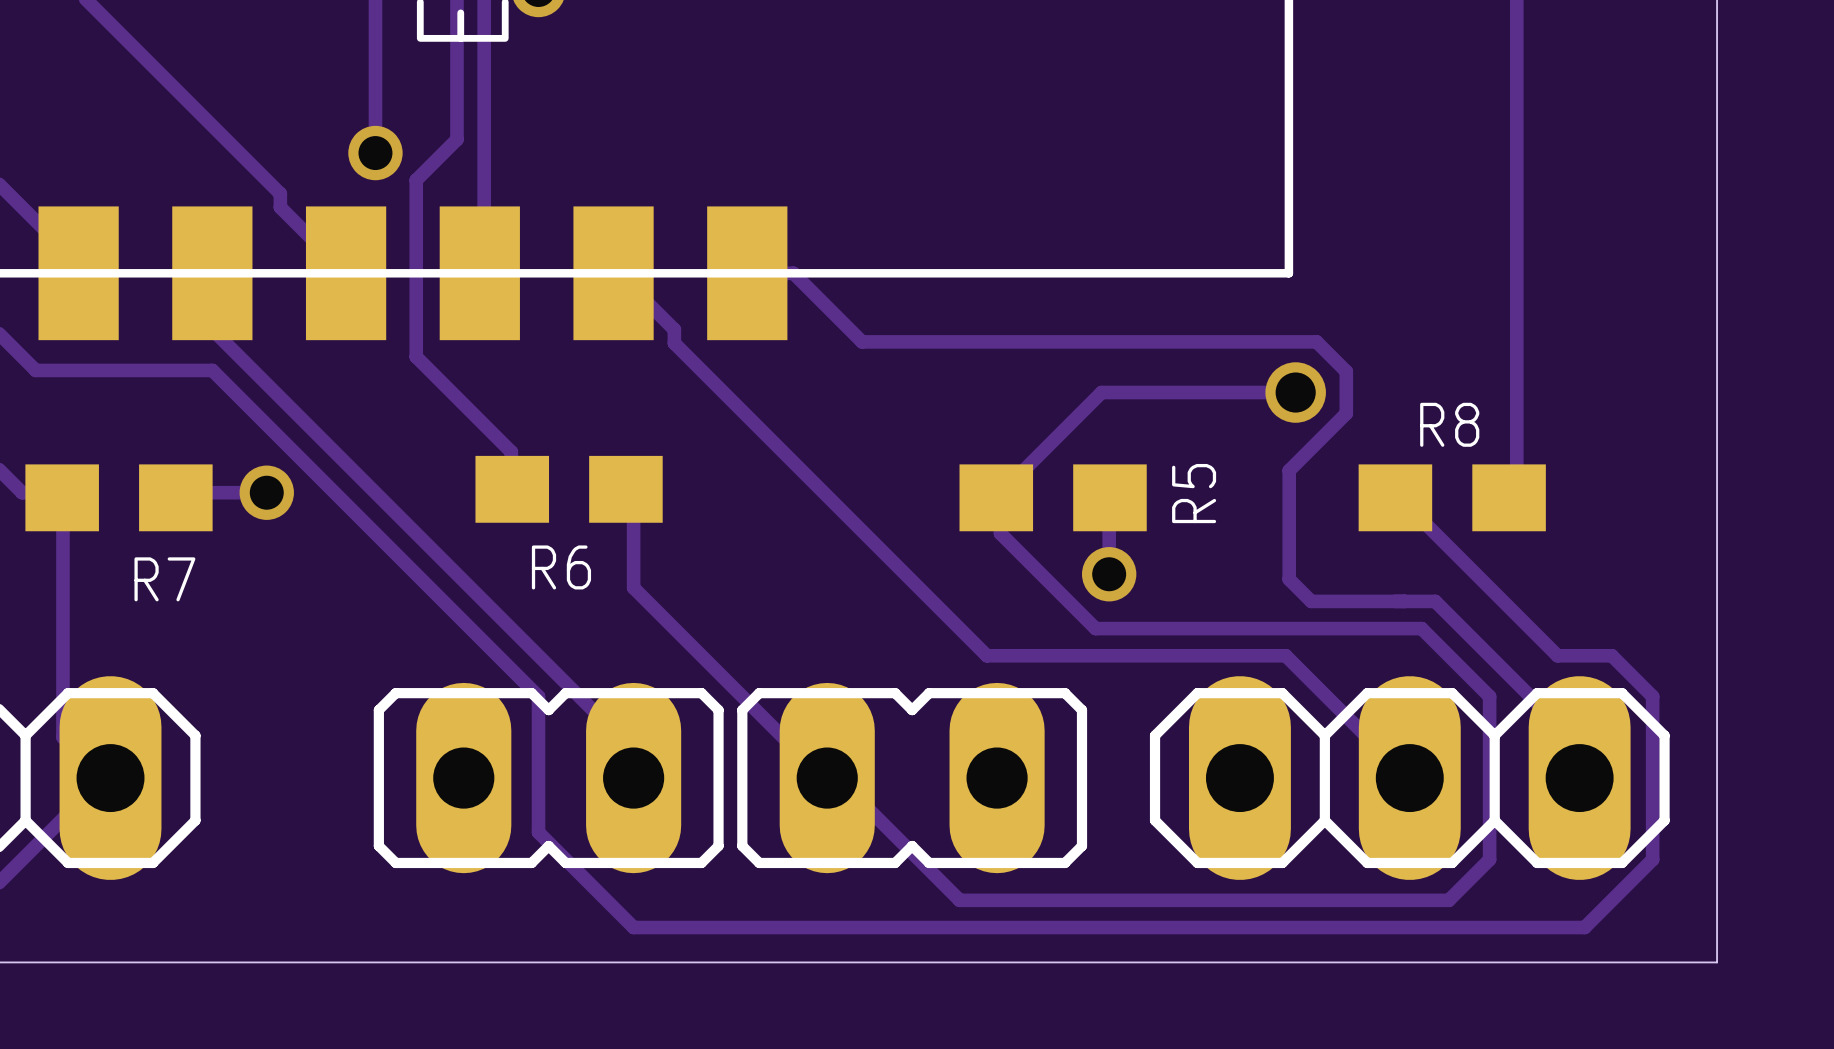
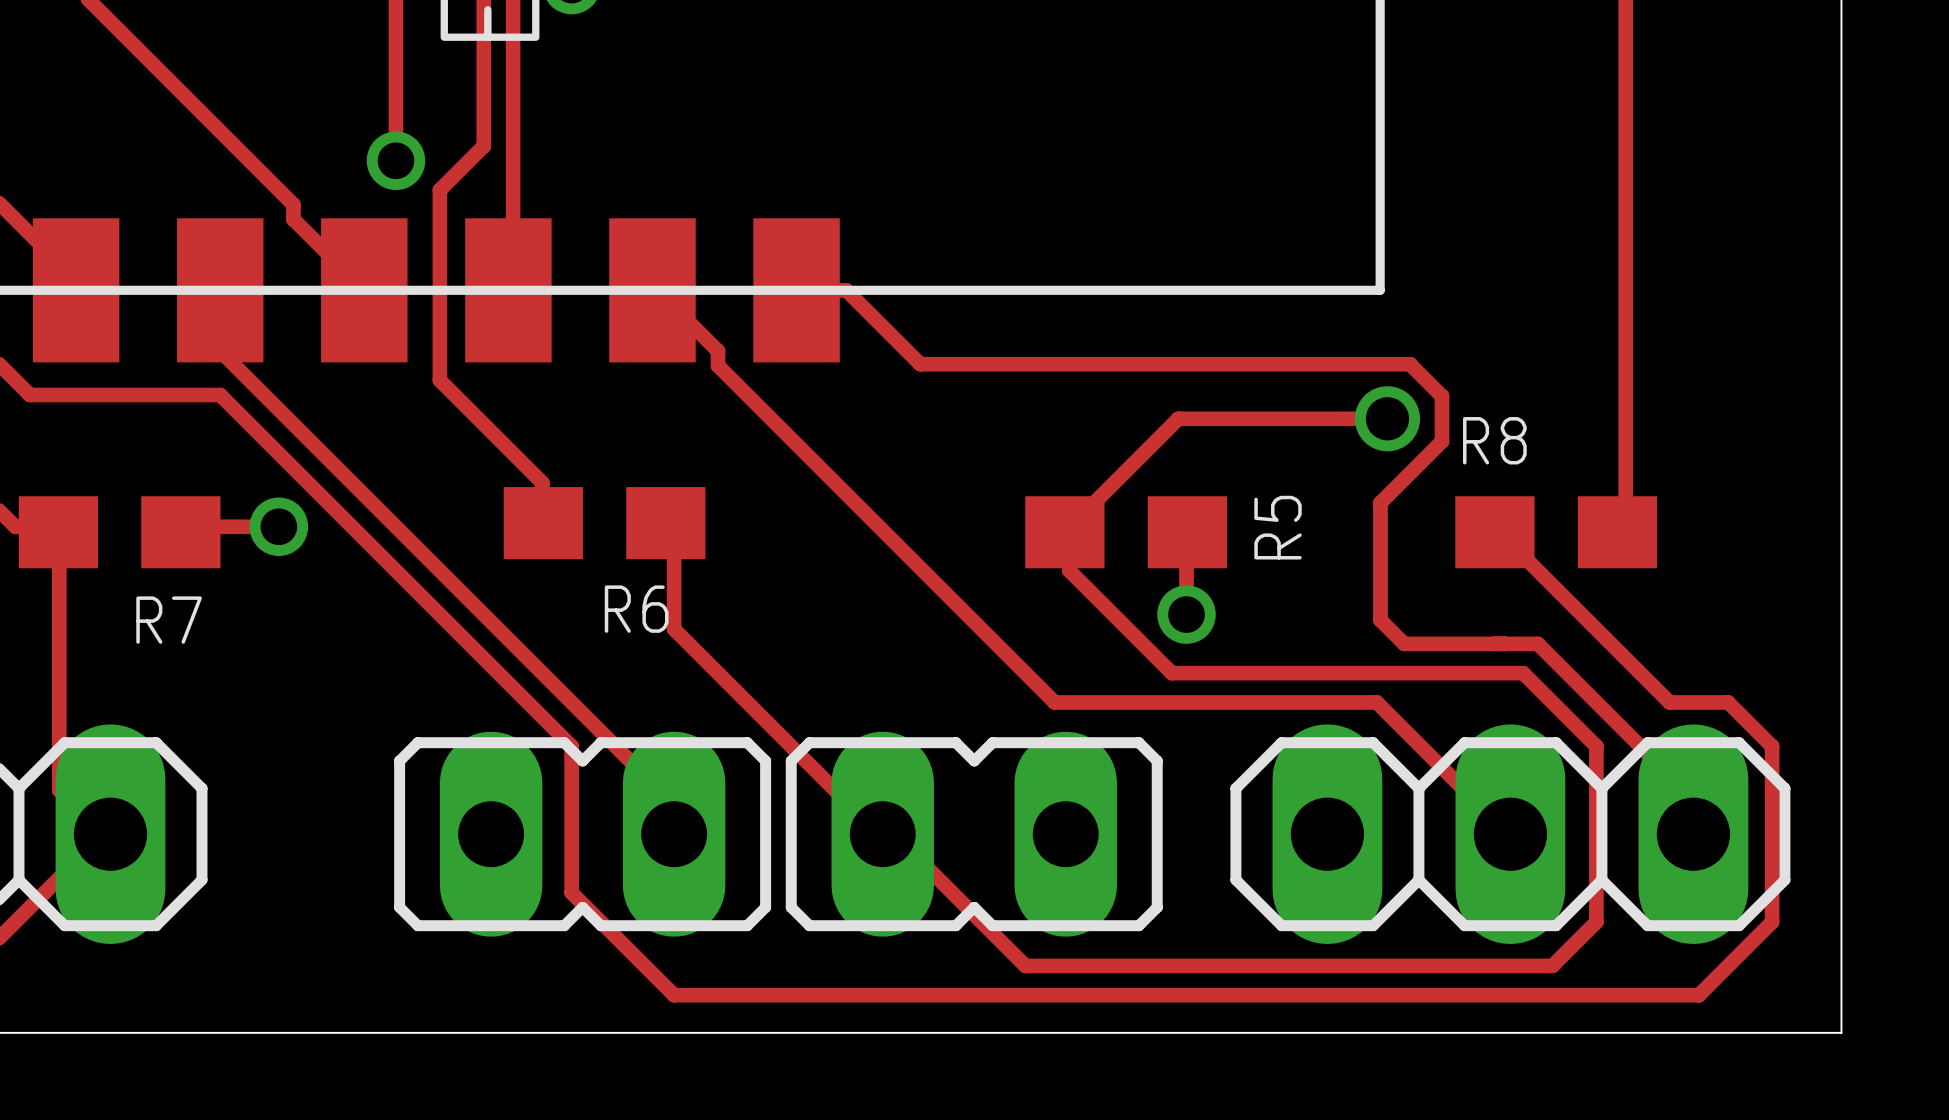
R8 name position: R8 (1449, 424) -> R8 (1494, 440)
R6 name position: R6 (561, 567) -> R6 (636, 609)

